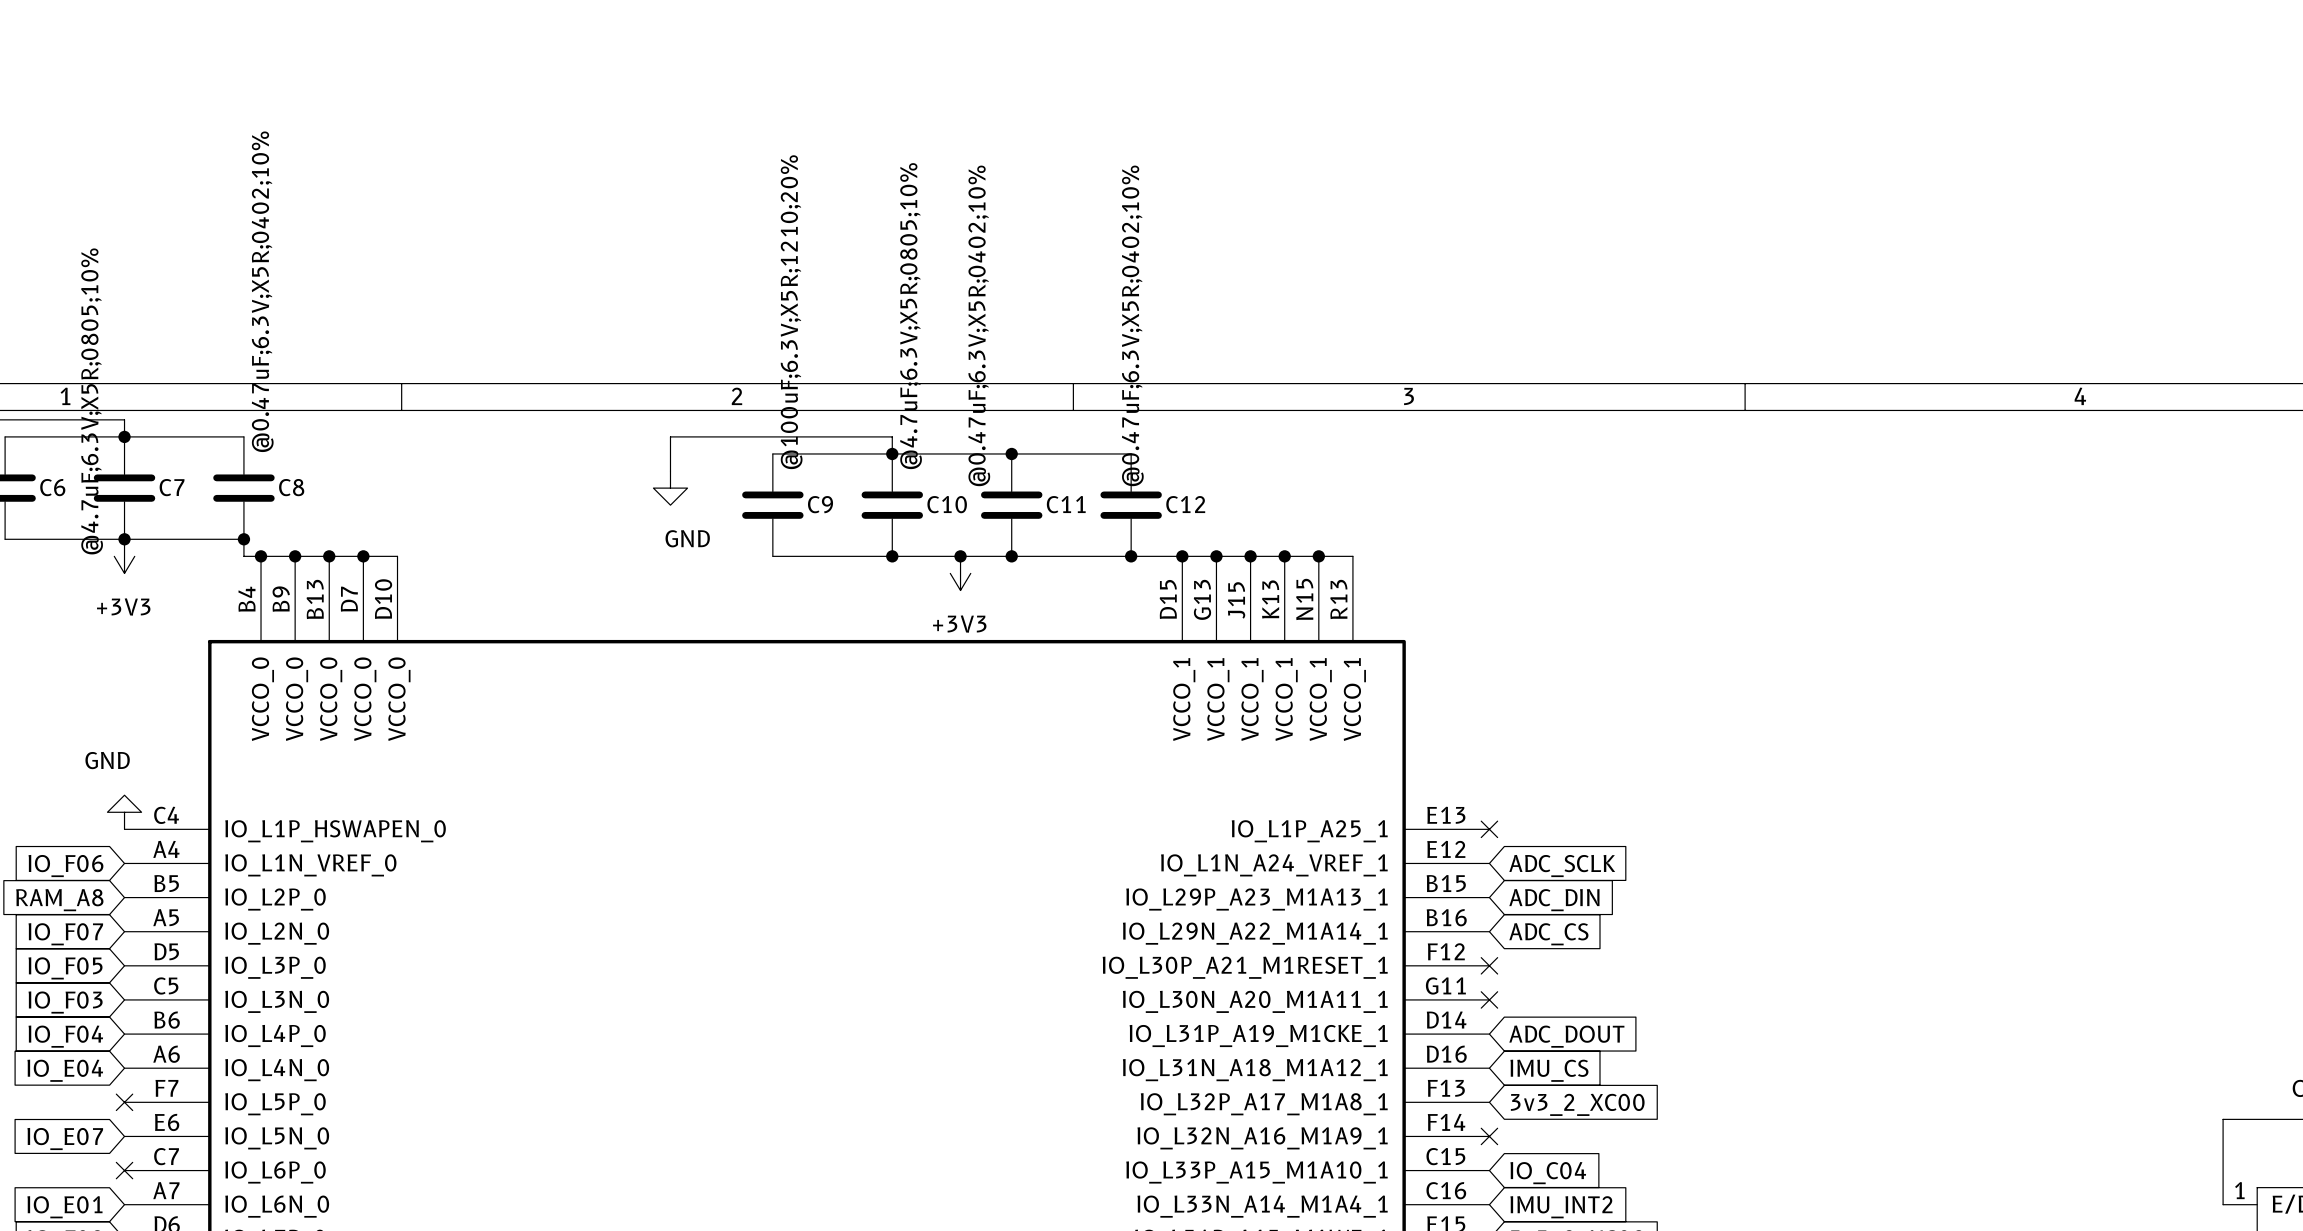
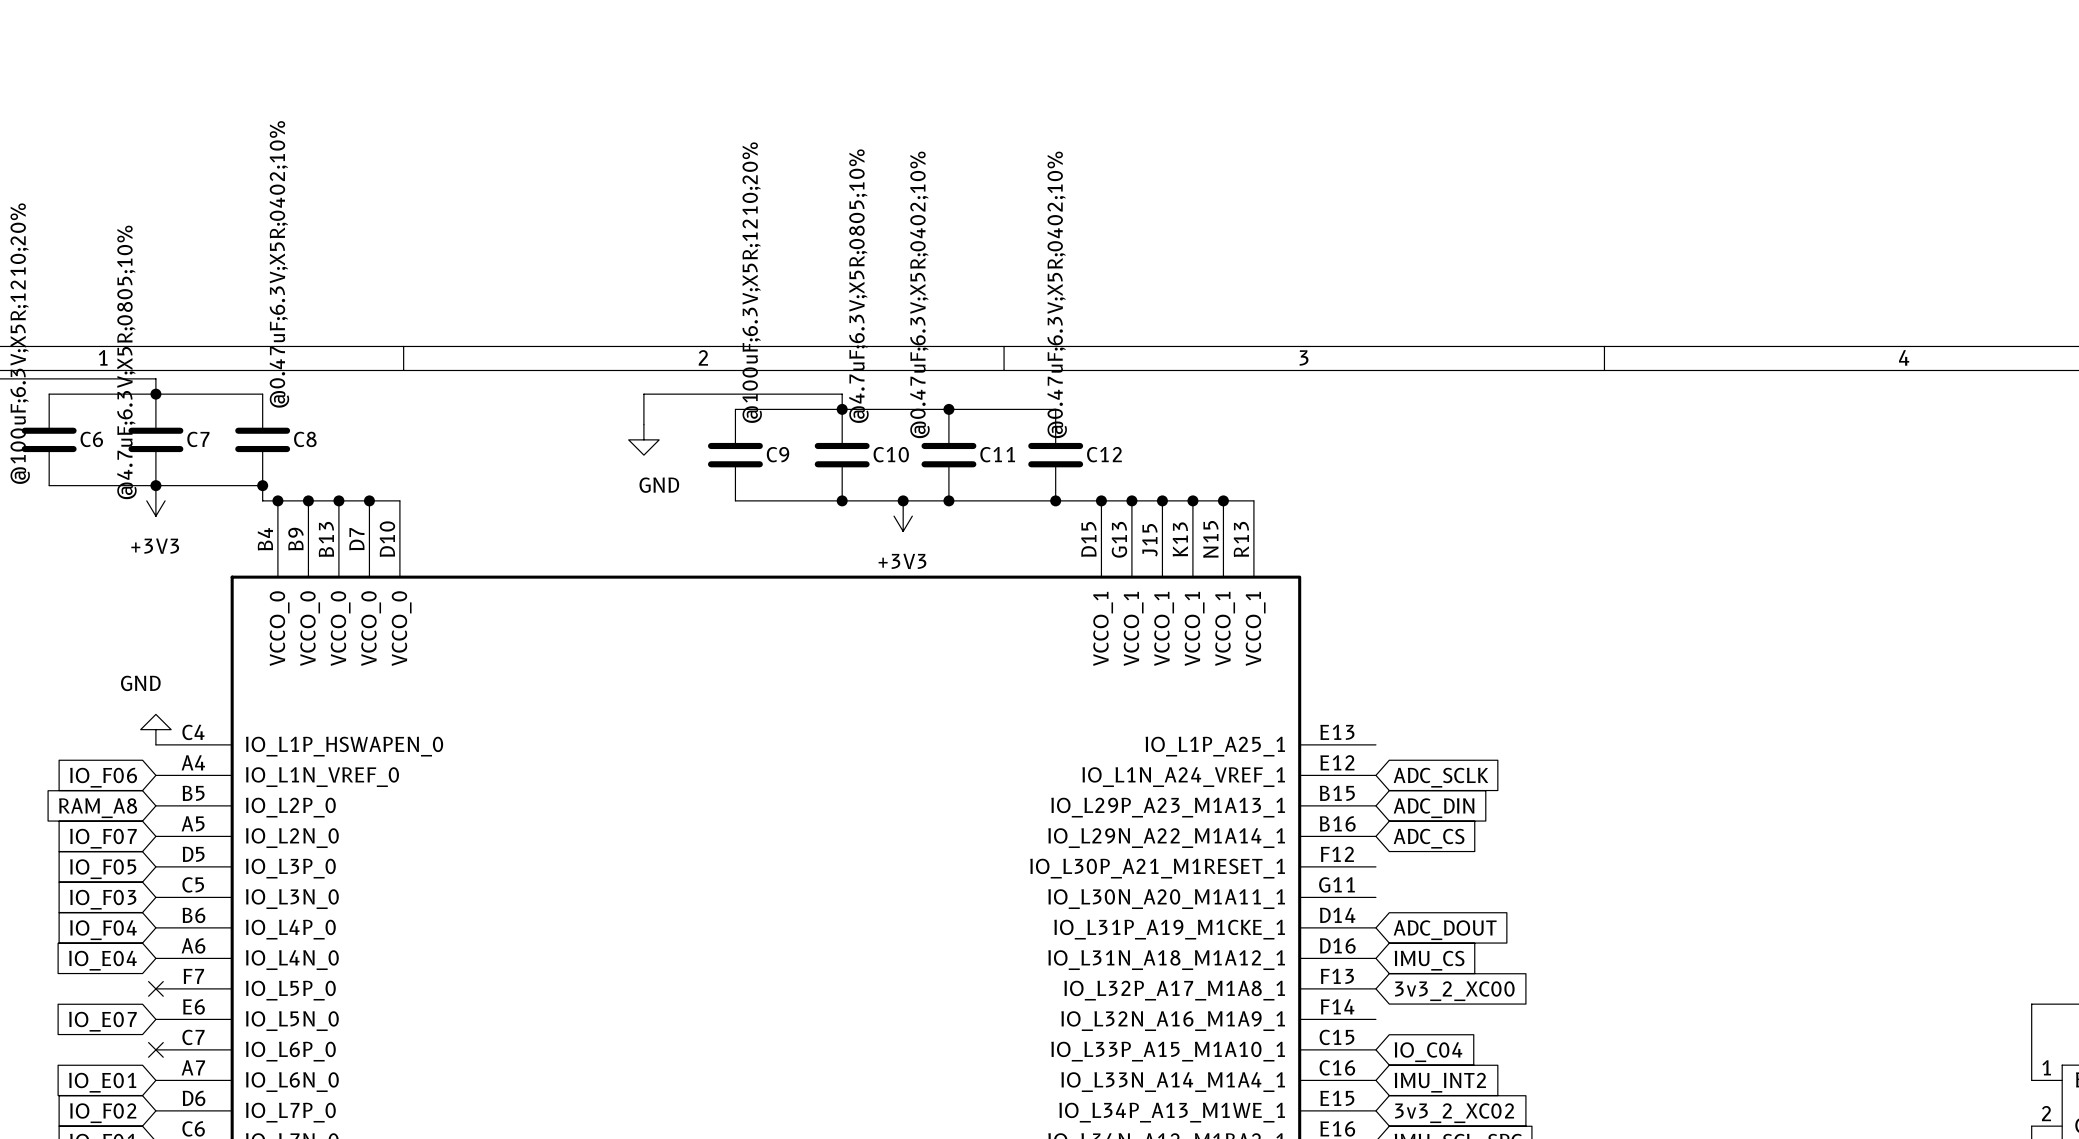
no-connect mark: (1489, 829) -> none
no-connect mark: (1489, 965) -> none
no-connect mark: (1489, 999) -> none
no-connect mark: (1489, 1136) -> none

